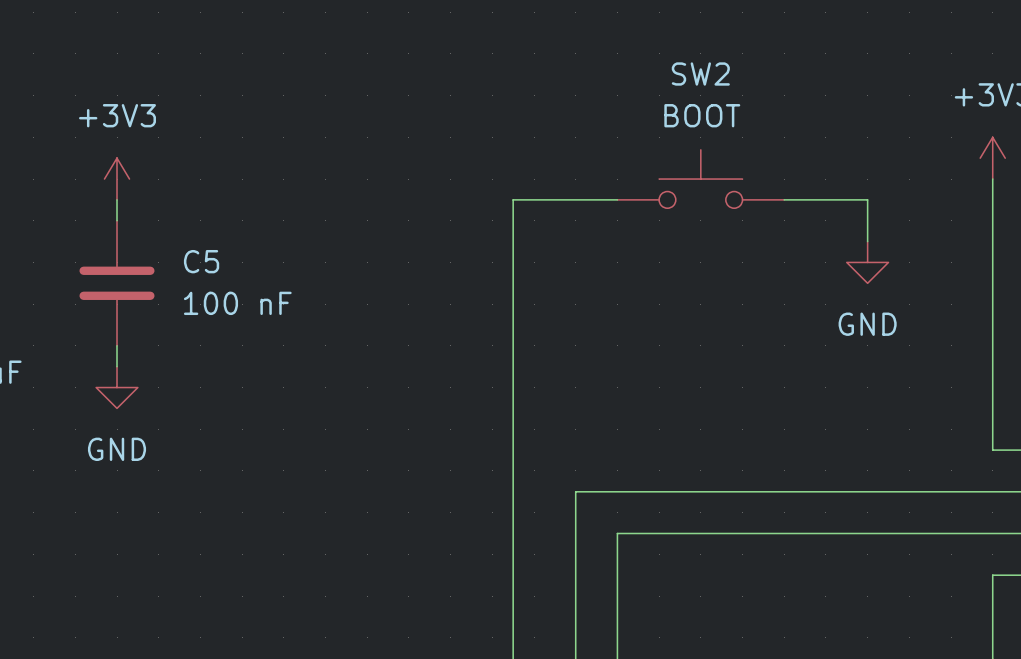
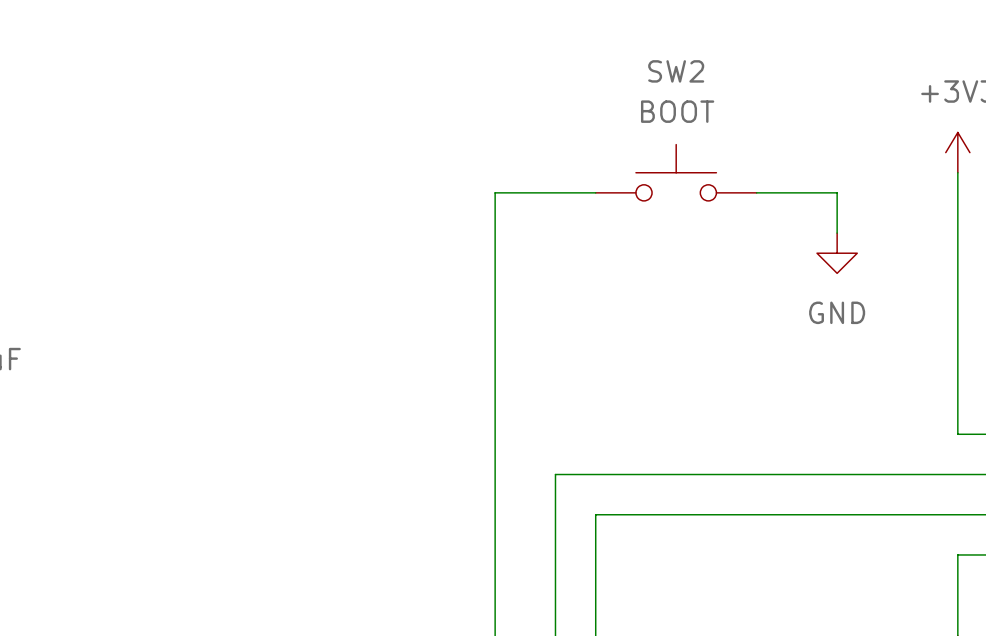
power symbol: +3V3 (117, 179) -> none
wire: (117, 199) (117, 220) -> none
C5: 100 nF (117, 283) -> none
wire: (117, 345) (117, 366) -> none
power symbol: GND (117, 387) -> none

